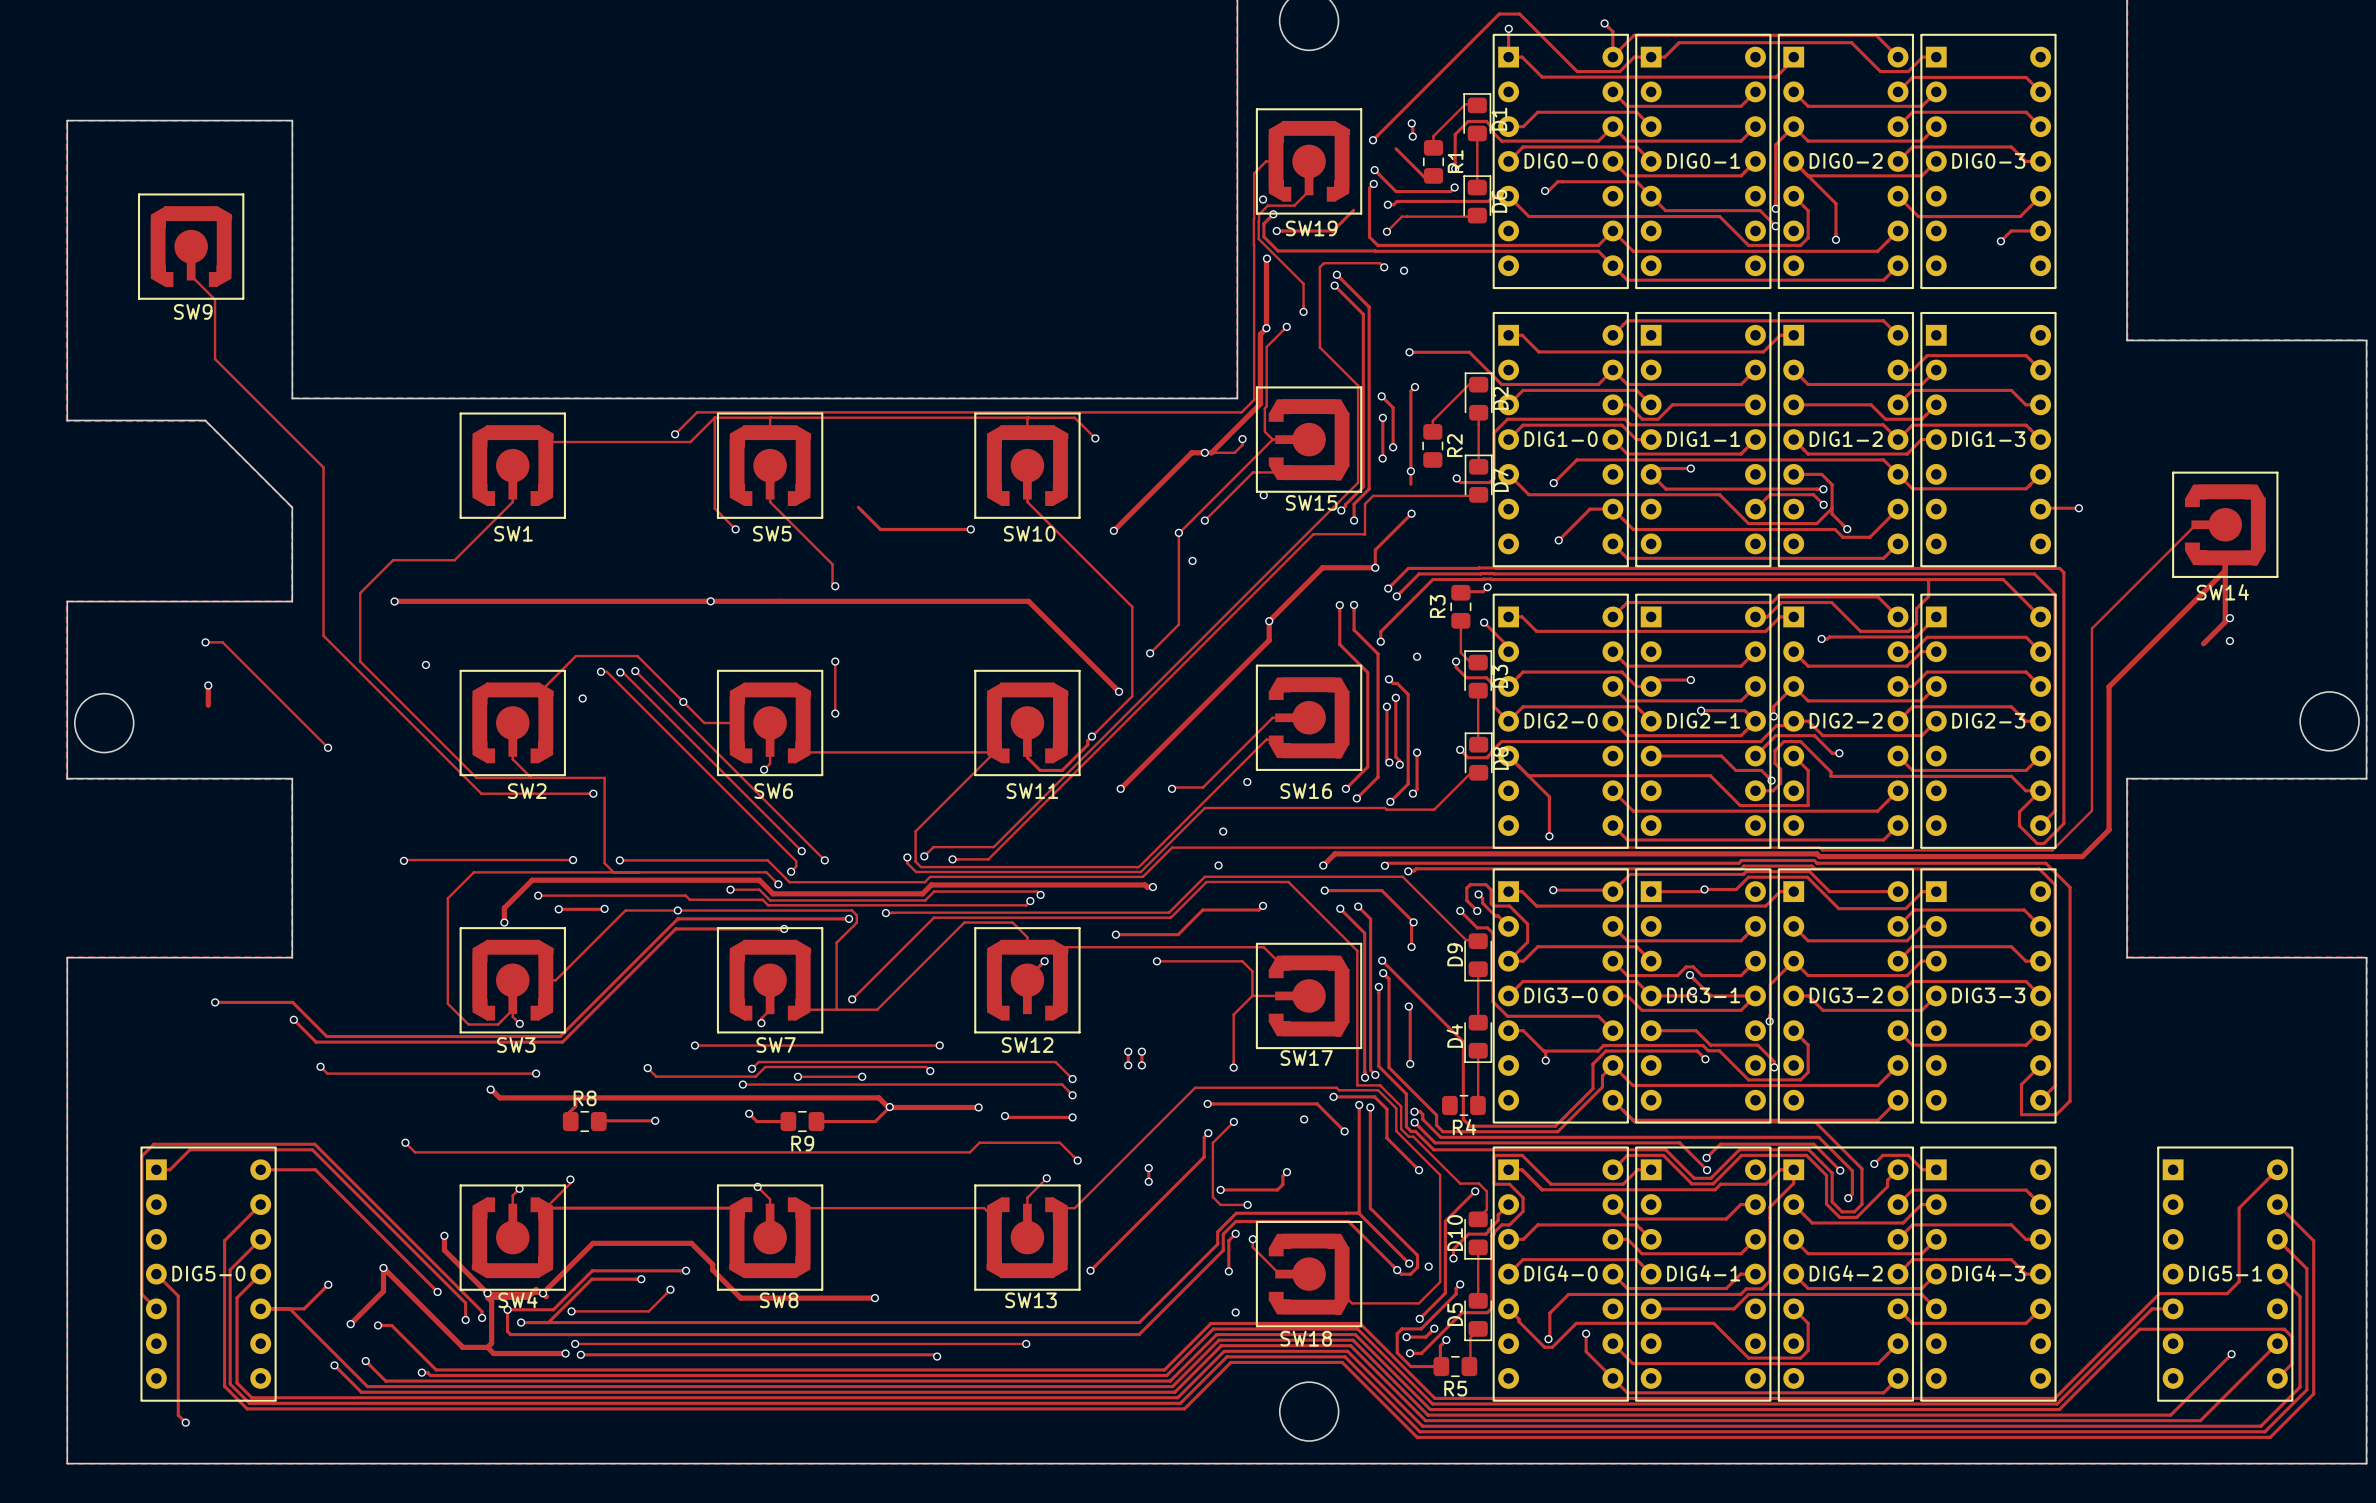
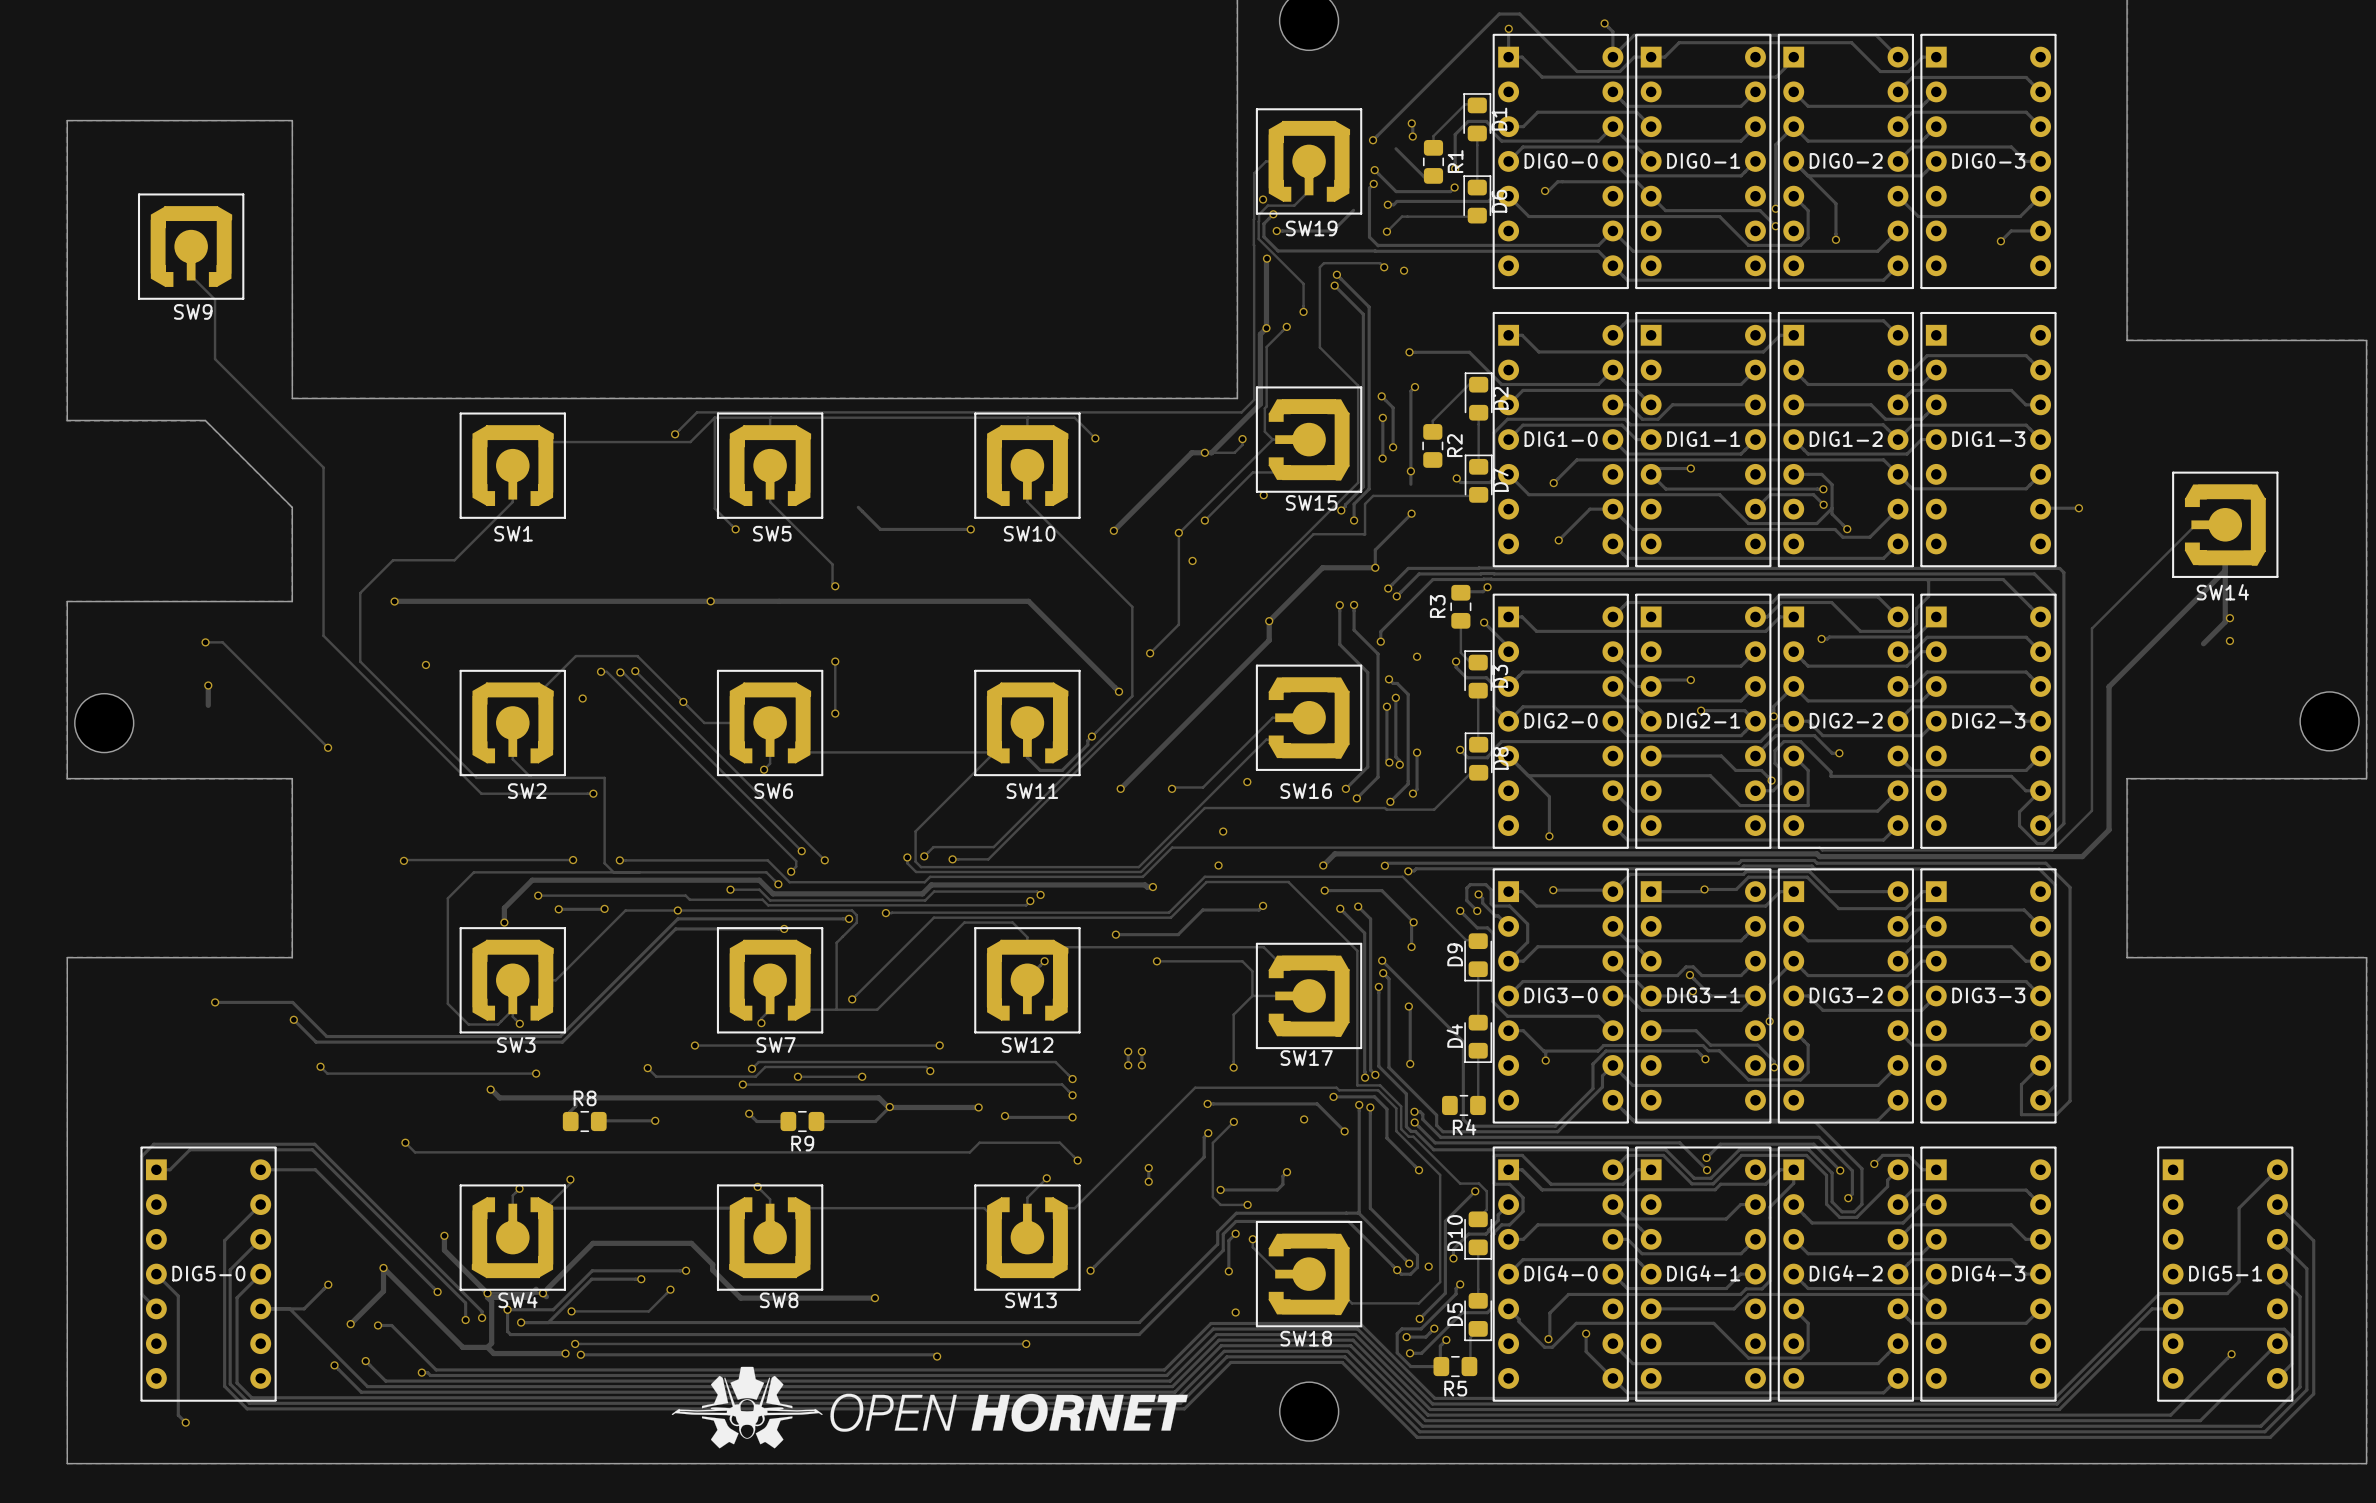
drawing: none -> [671, 1366, 1188, 1449]

